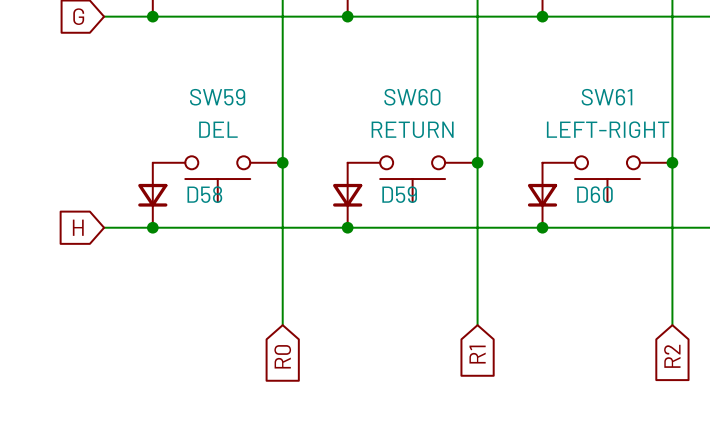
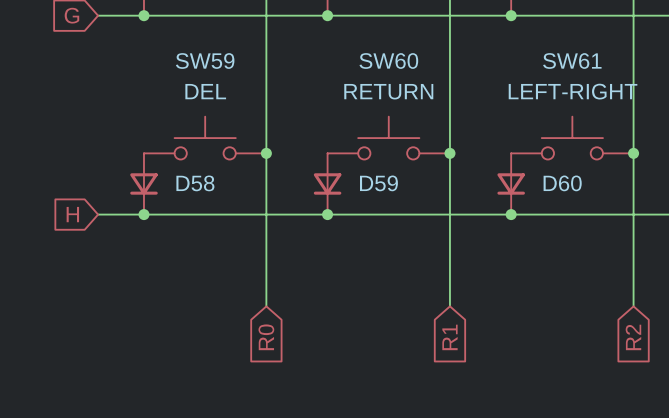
SW59 rotation: 0° (217, 179) -> 180° (205, 138)
SW60 rotation: 0° (412, 179) -> 180° (388, 138)
SW61 rotation: 0° (607, 179) -> 180° (572, 138)

